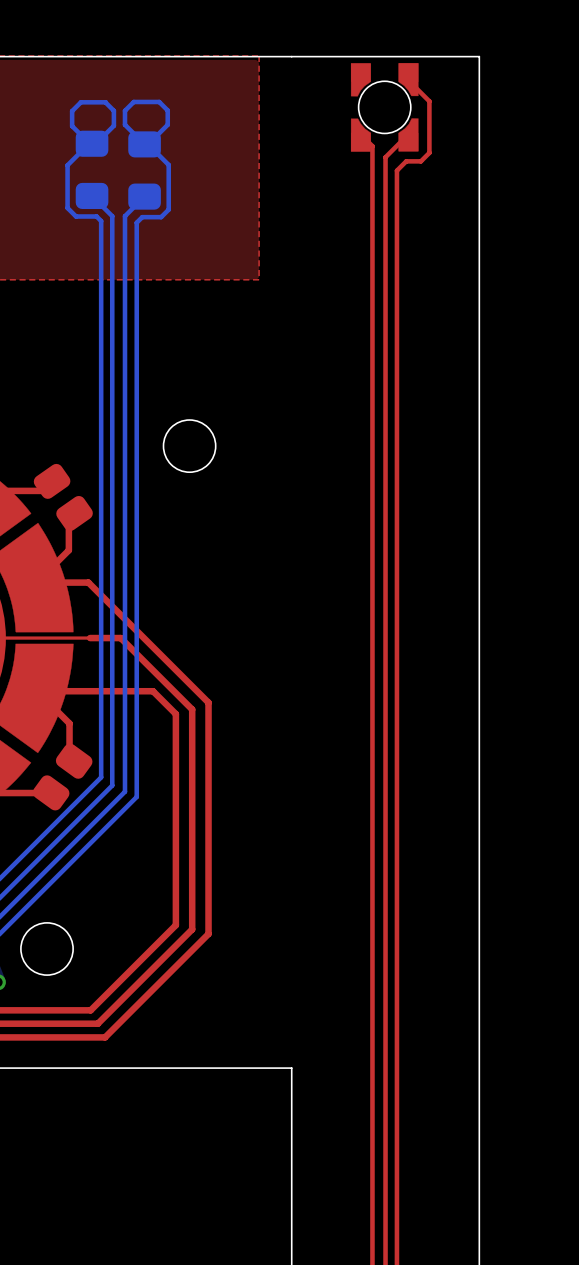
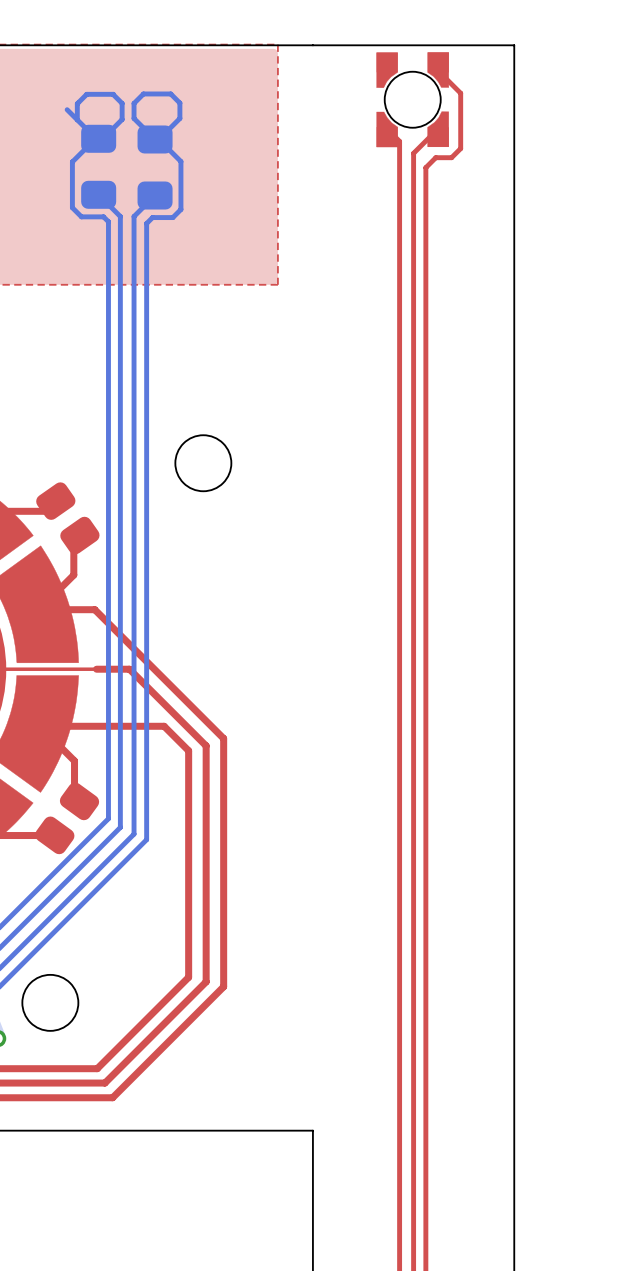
bottom track: none -> (67, 109) (77, 119)

